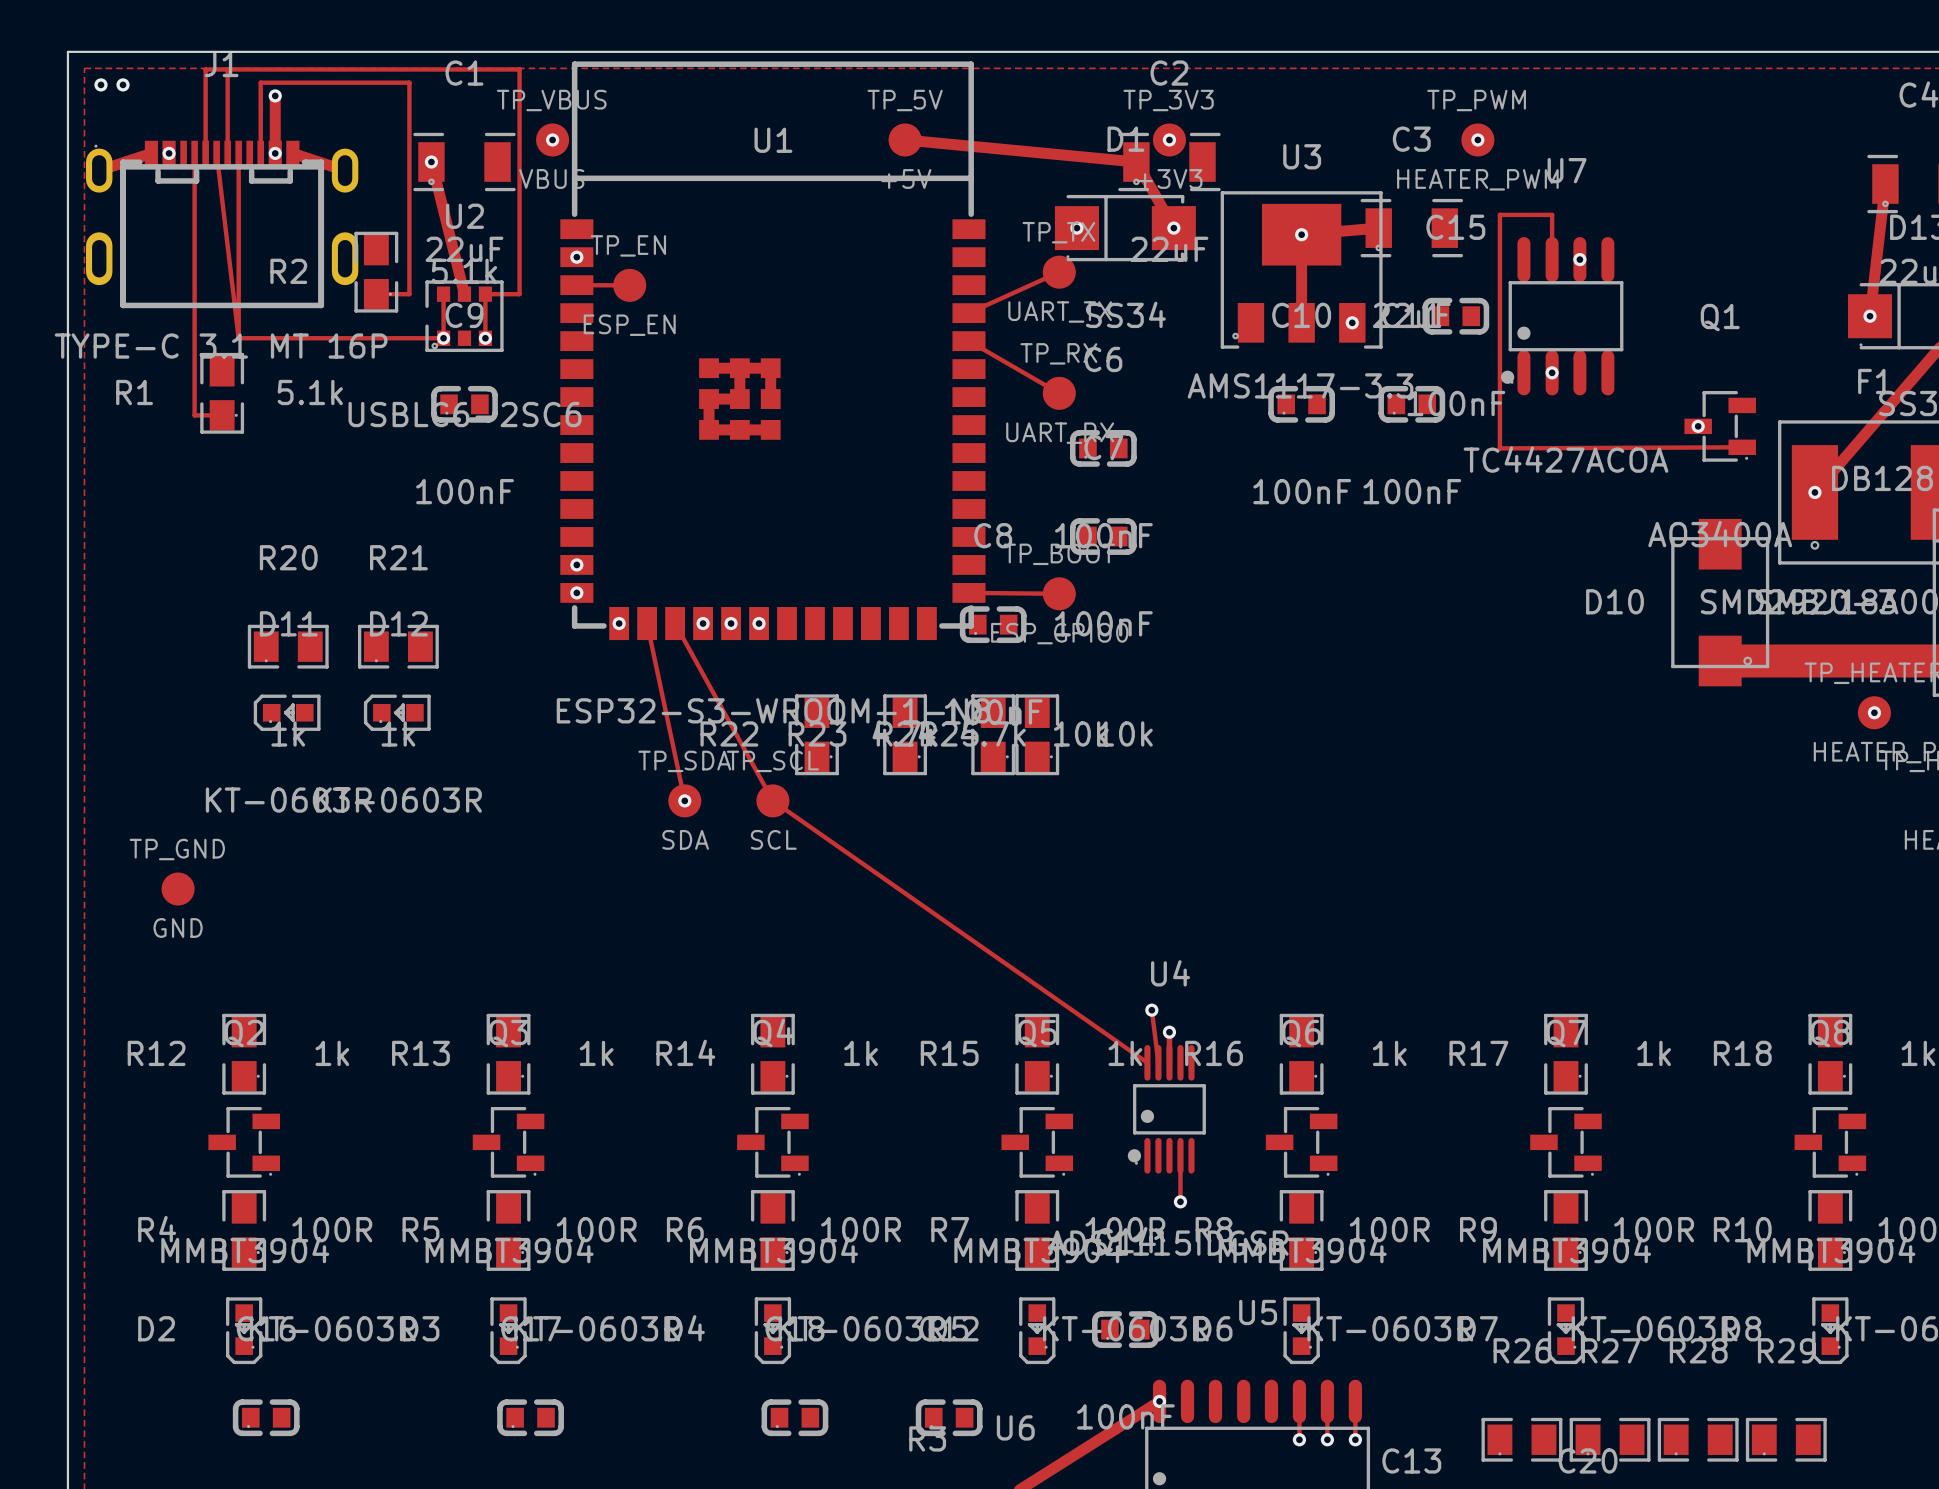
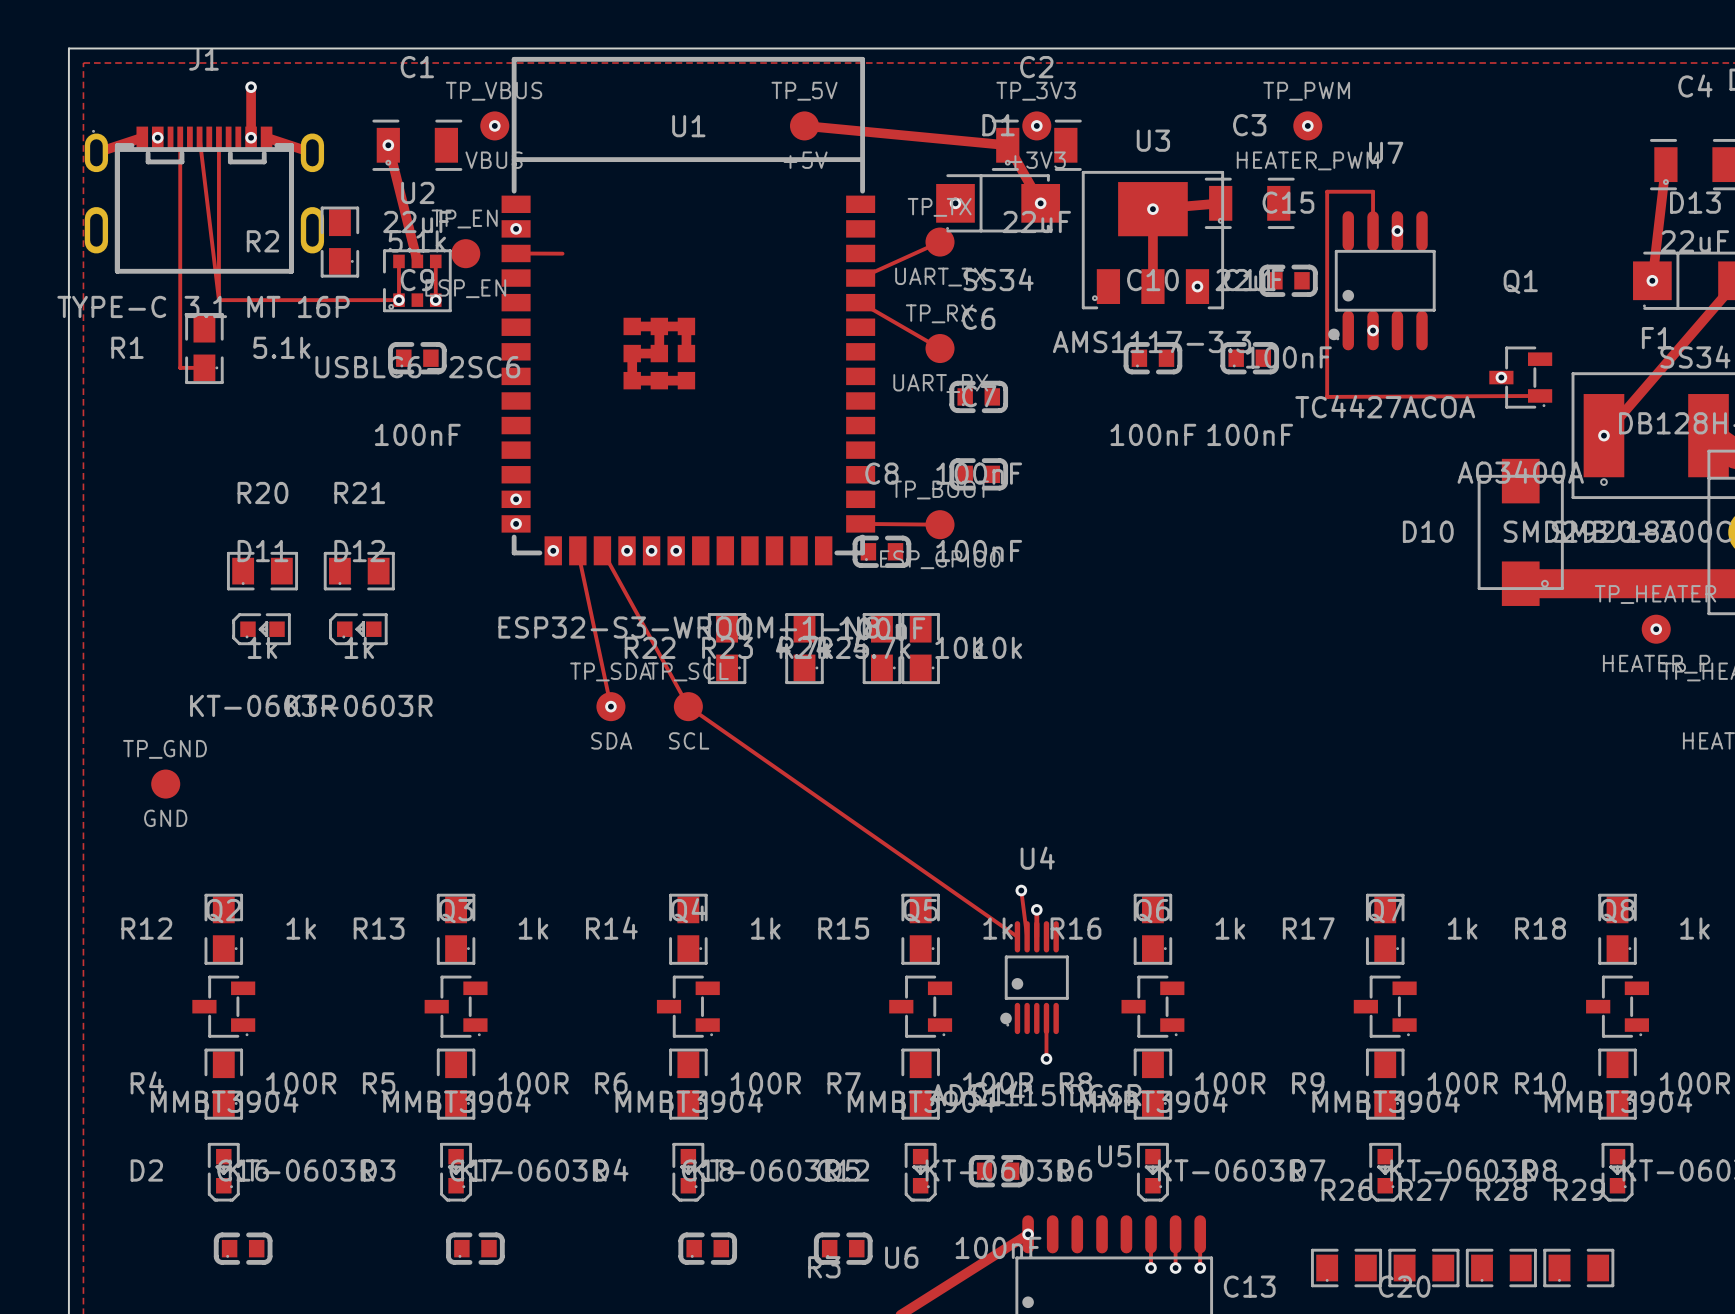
track: (227, 69) (227, 153) -> none
via: (100, 84) -> none
via: (123, 84) -> none
track: (205, 153) (205, 69) (519, 69) (519, 294) (485, 294) -> none
track: (260, 153) (260, 82) (409, 82) (409, 294) (376, 294) -> none
TP_EN position: (629, 285) -> (465, 253)

